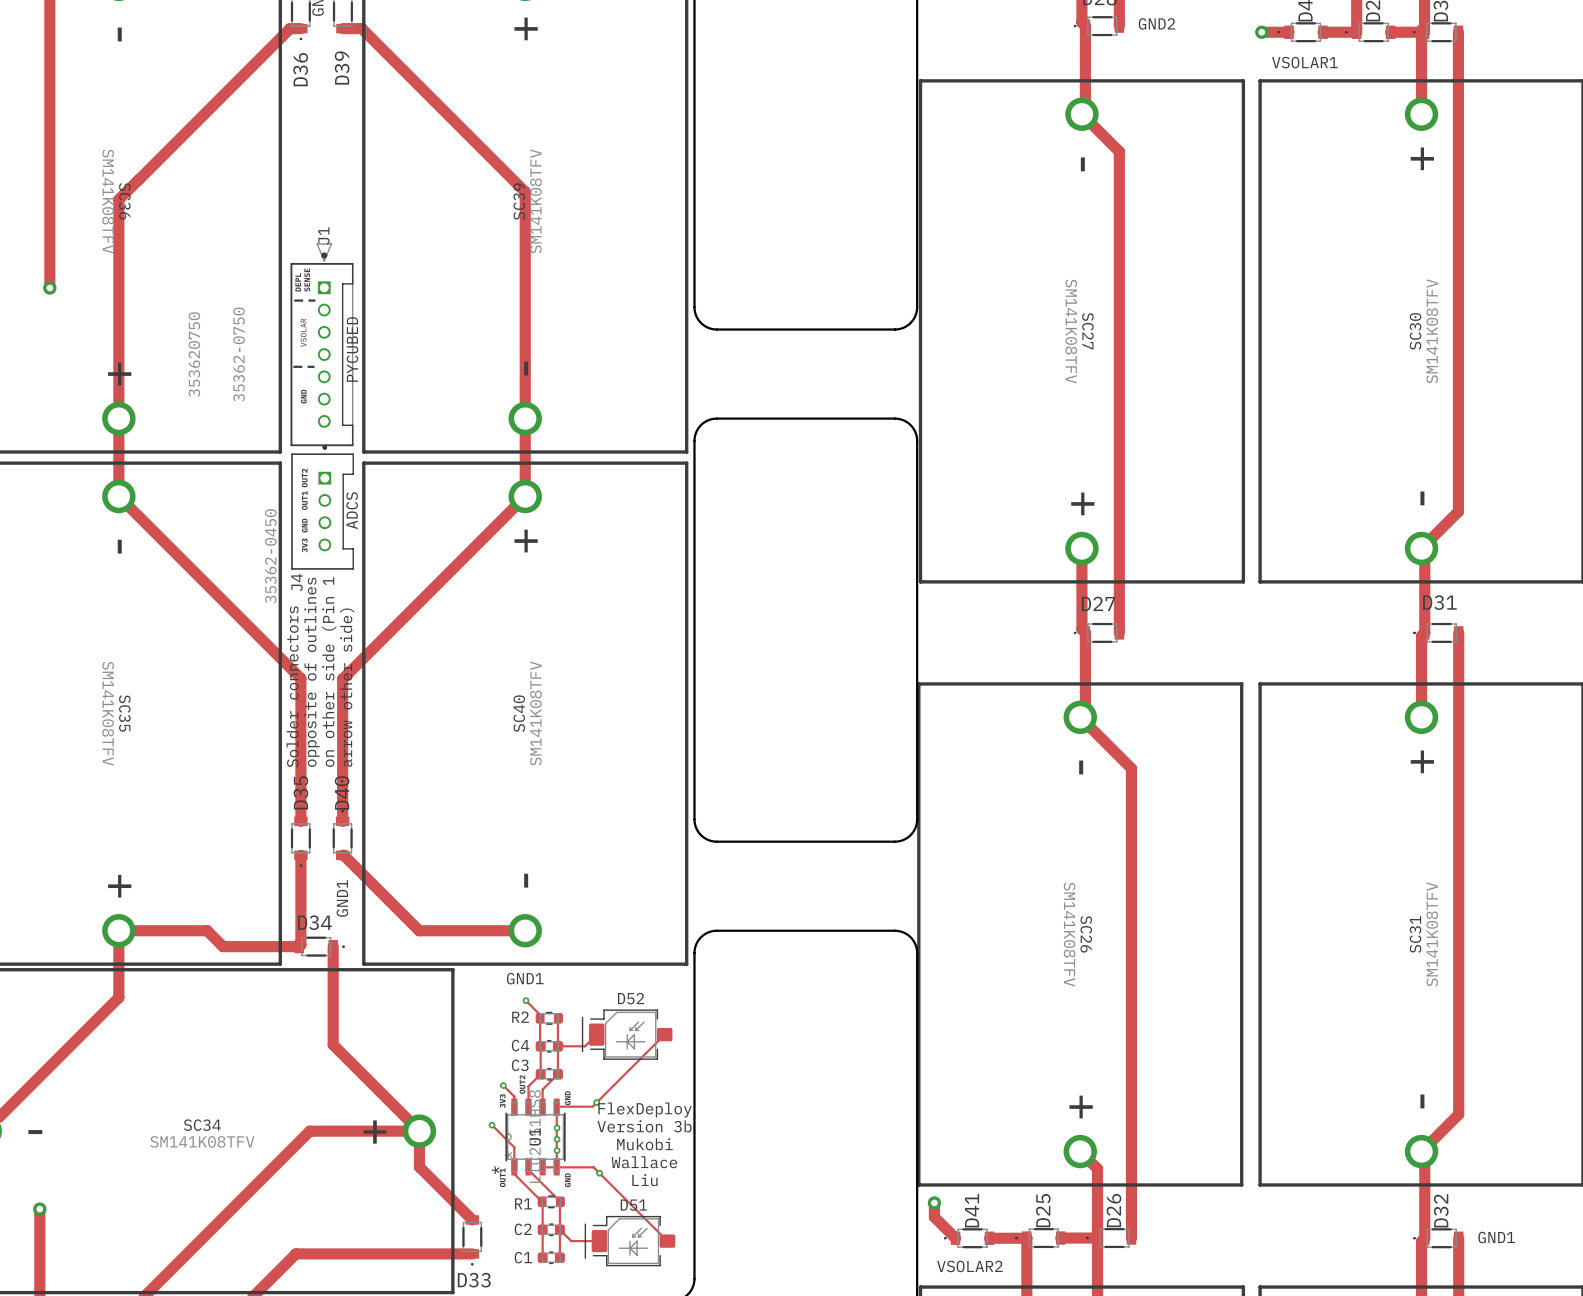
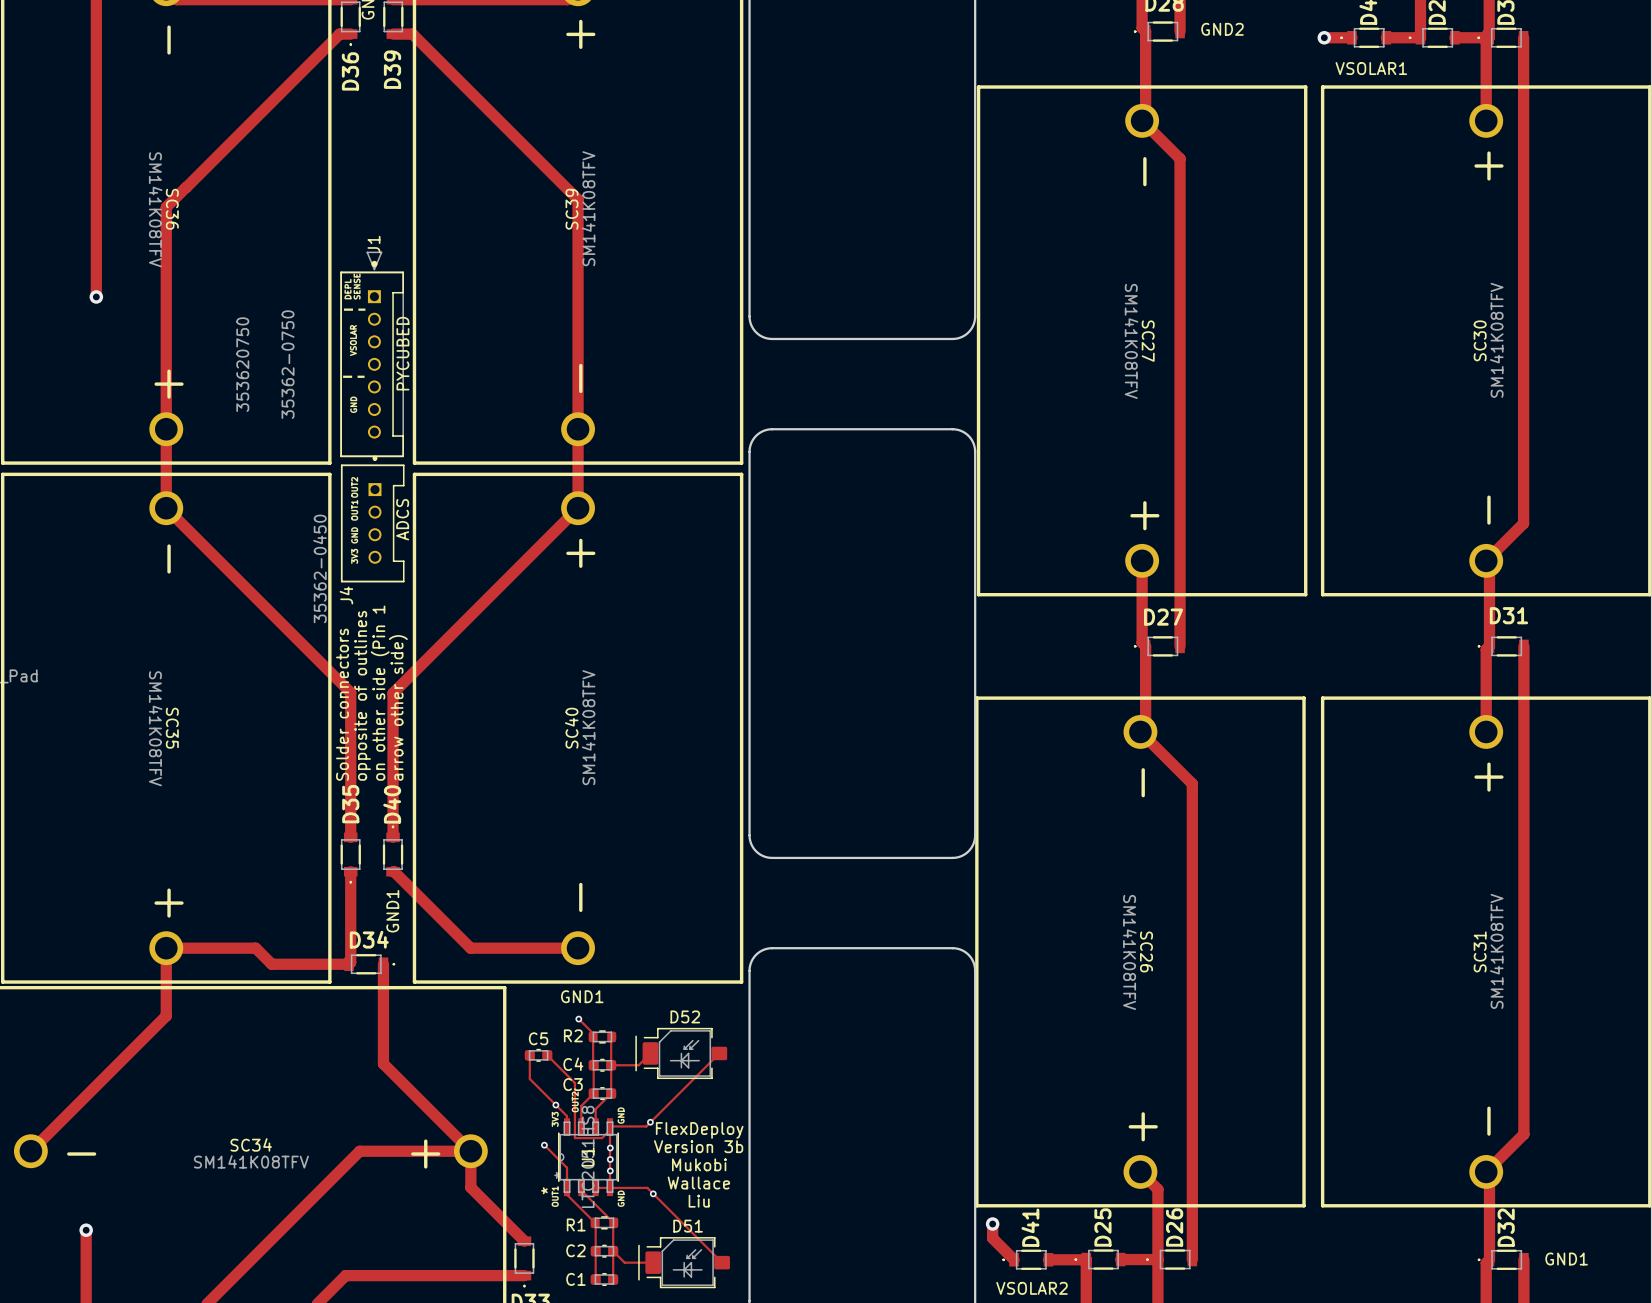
track: none -> (529, 1055) (529, 1078) (555, 1105)
C5: none -> (538, 1055)
track: none -> (547, 1055) (574, 1082) (574, 1138) (602, 1138) (609, 1130)

